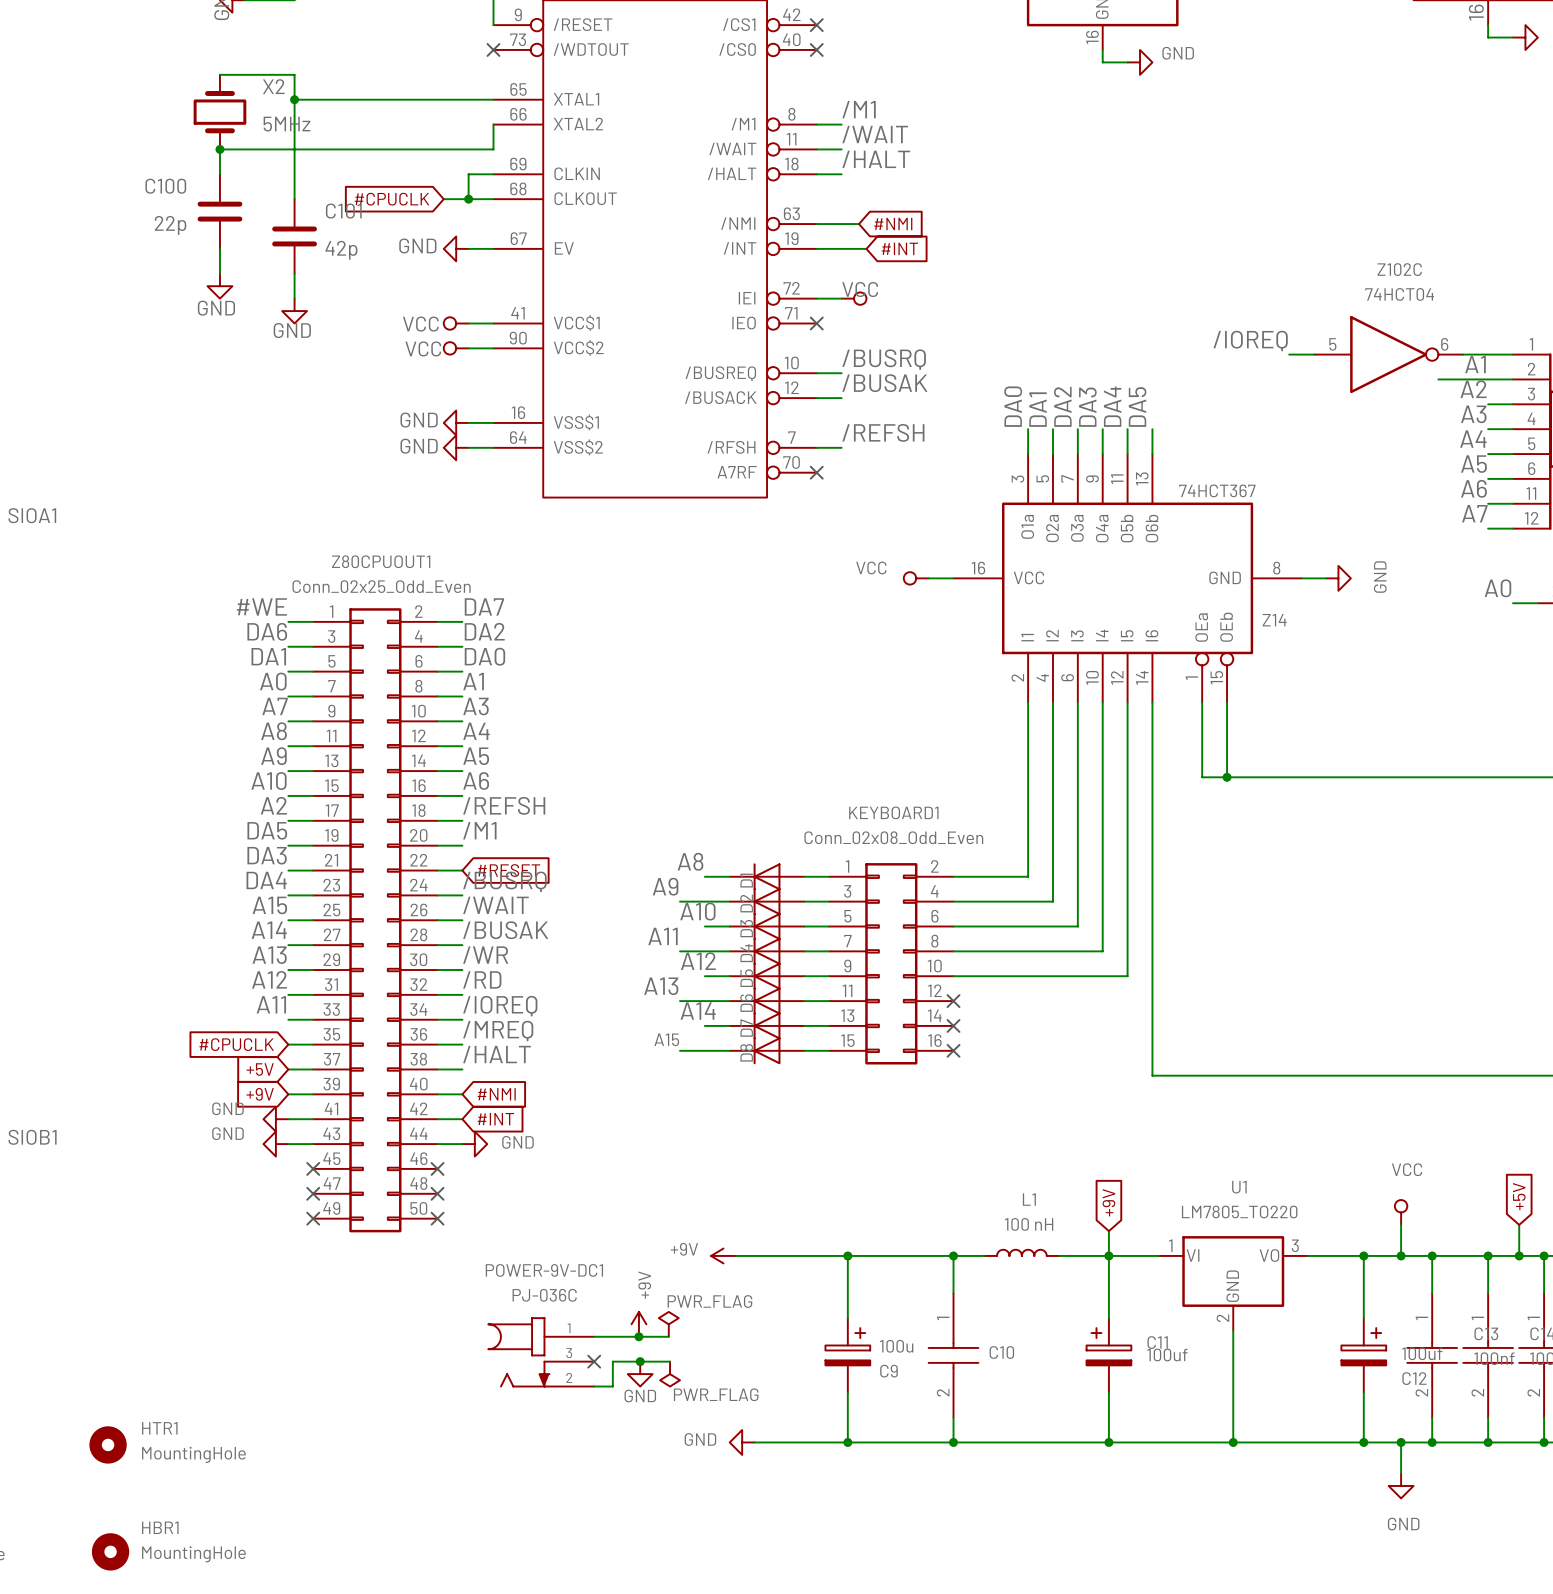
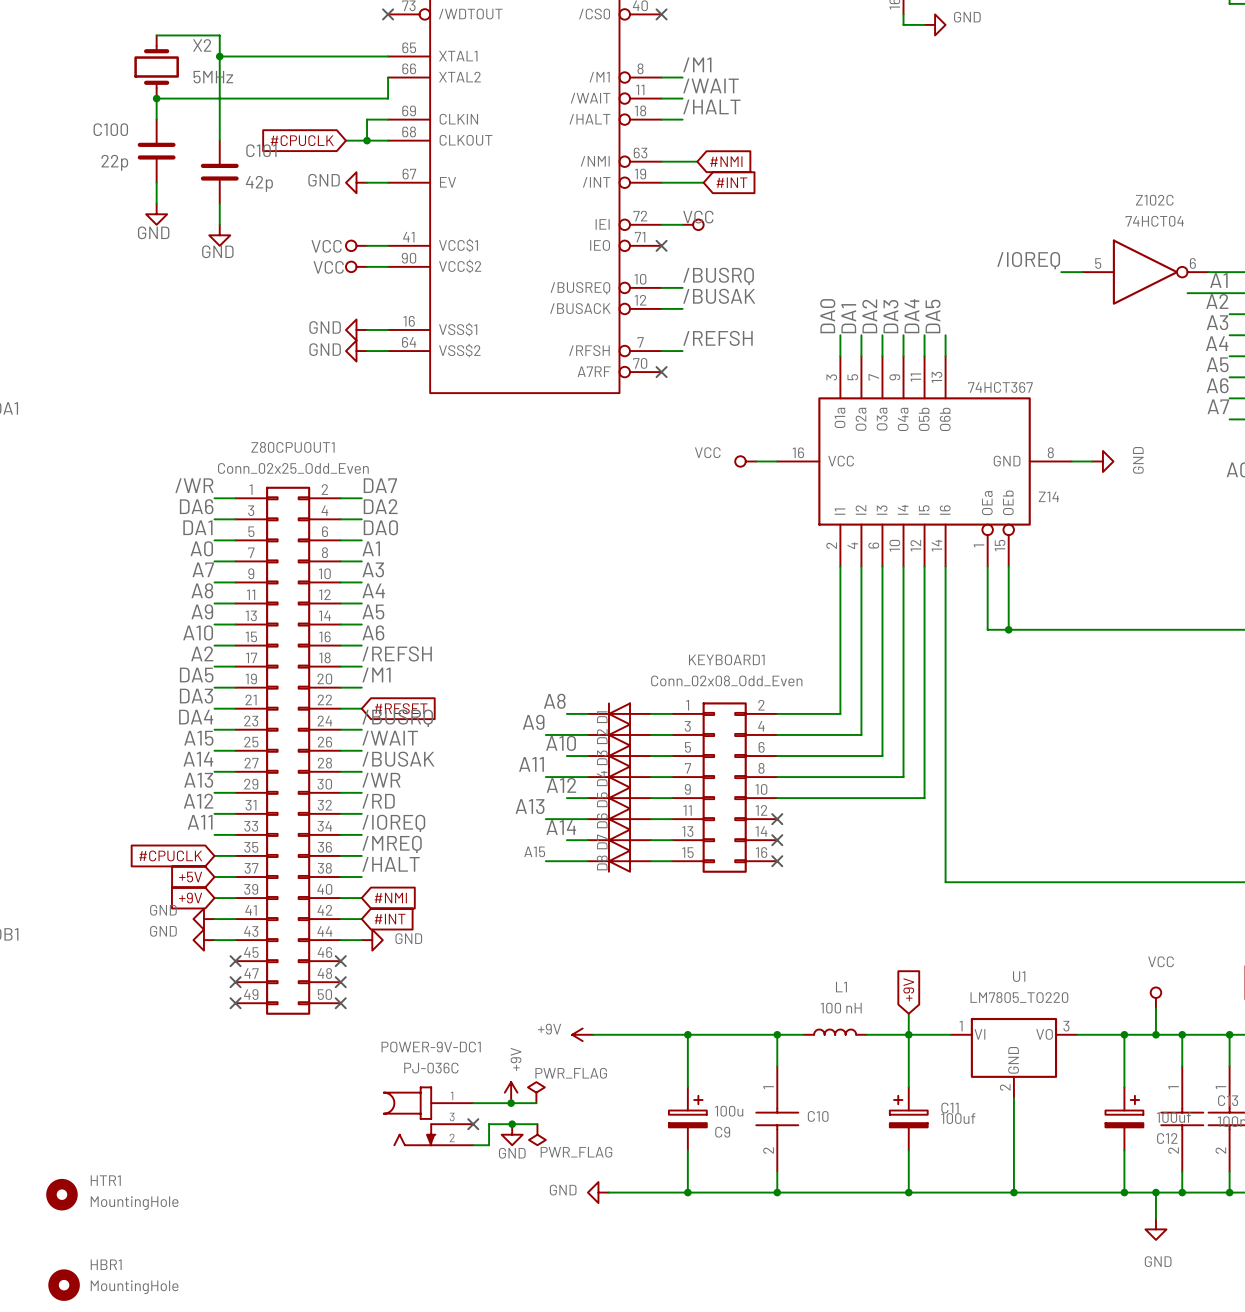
label: #WE (261, 606) -> /WR (194, 485)

